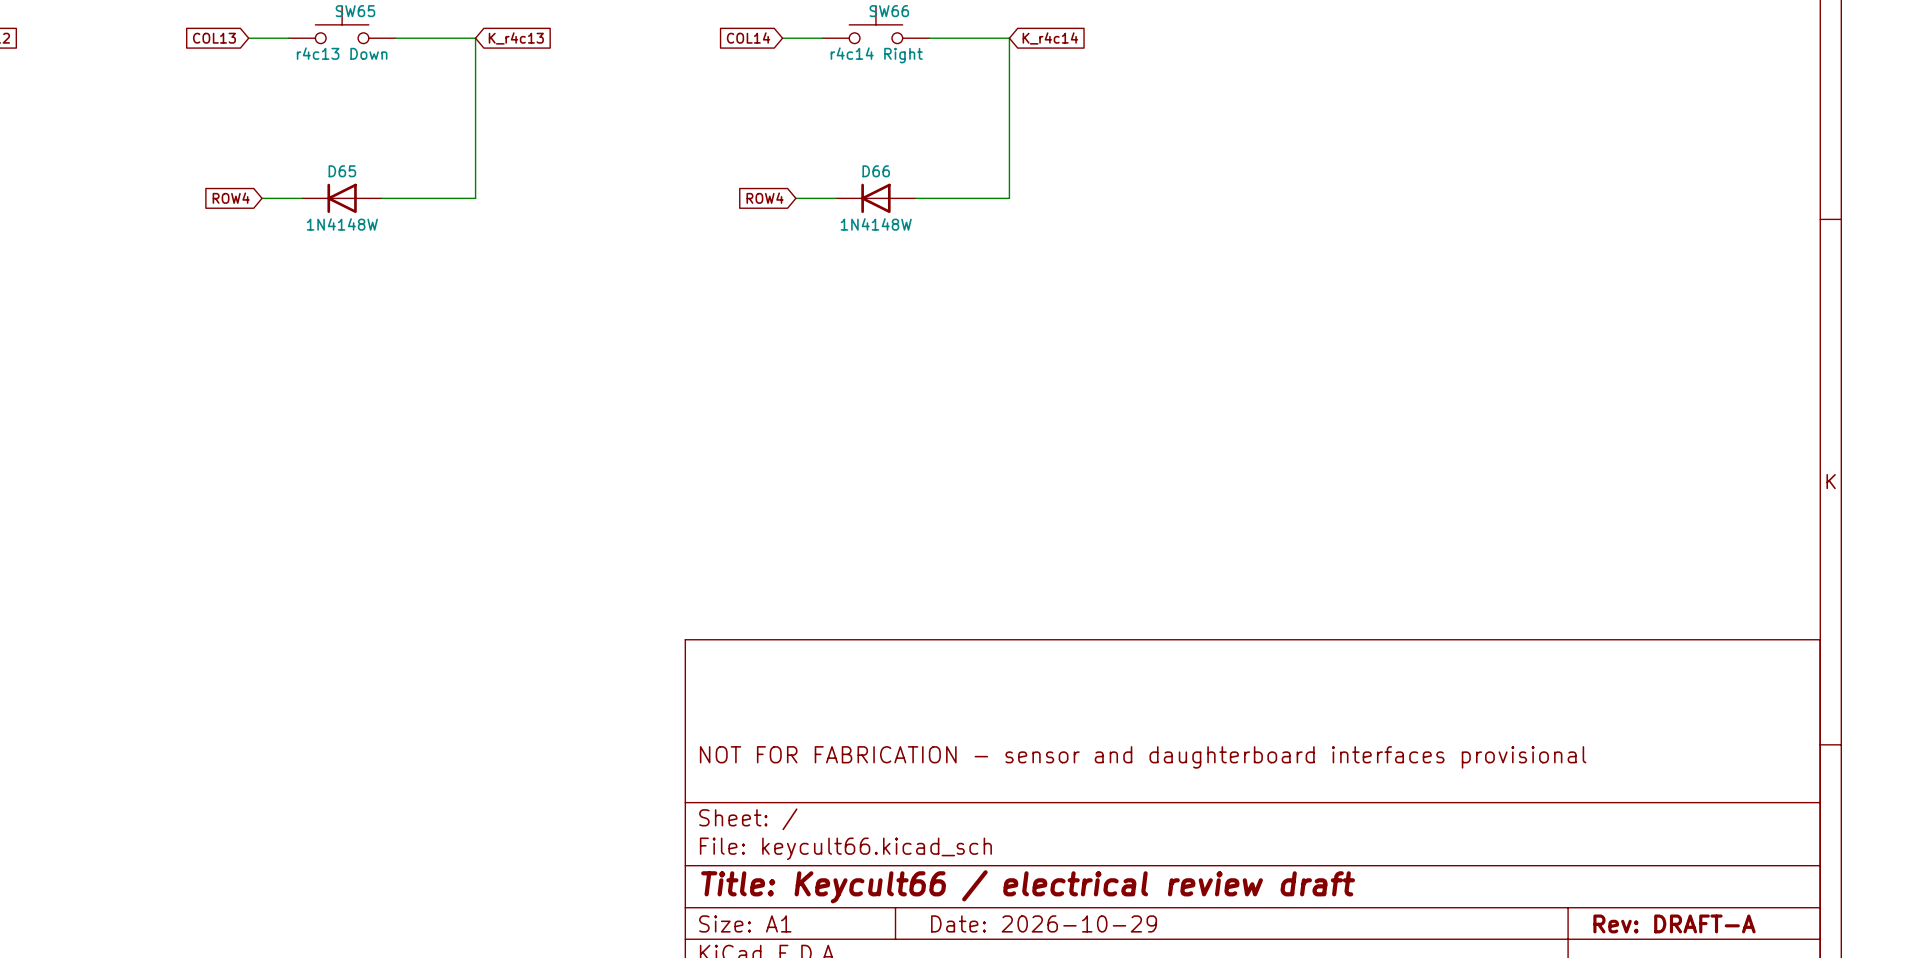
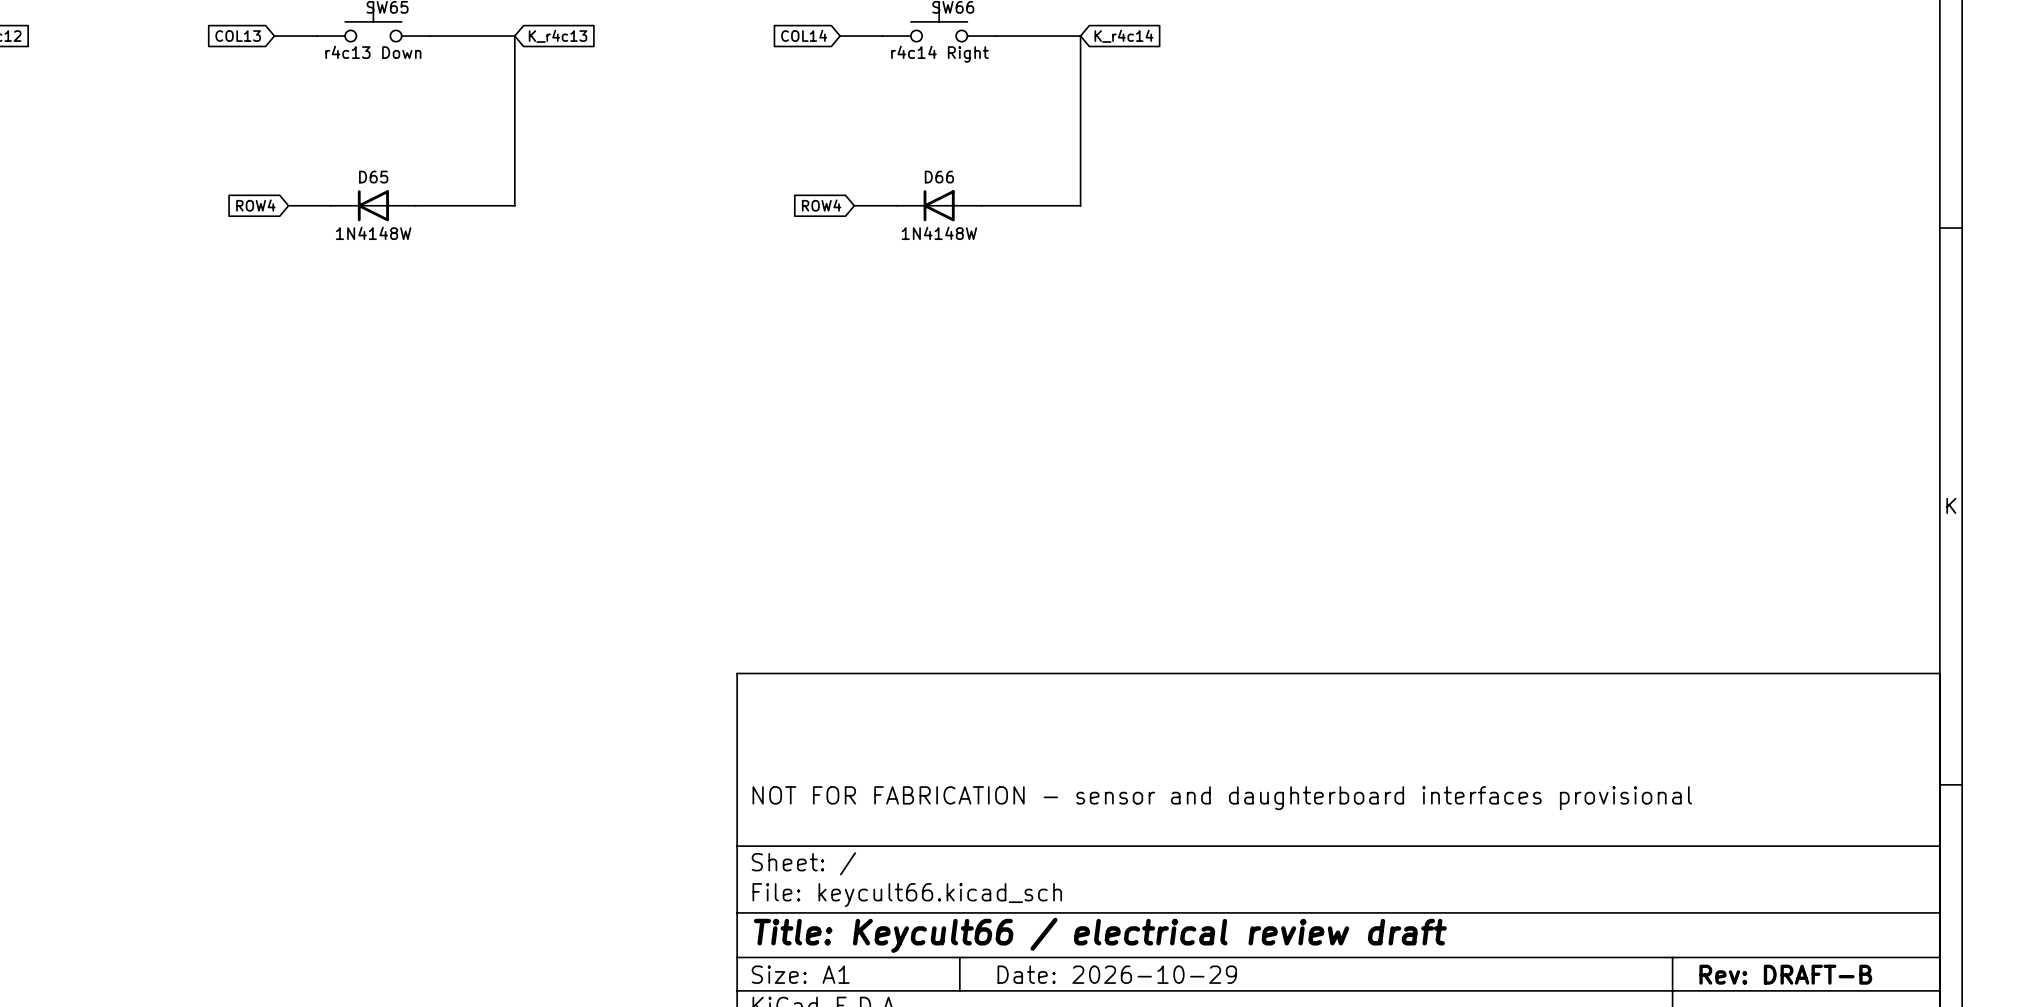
title block: Rev: DRAFT-A (1674, 923) -> Rev: DRAFT-B (1785, 974)

